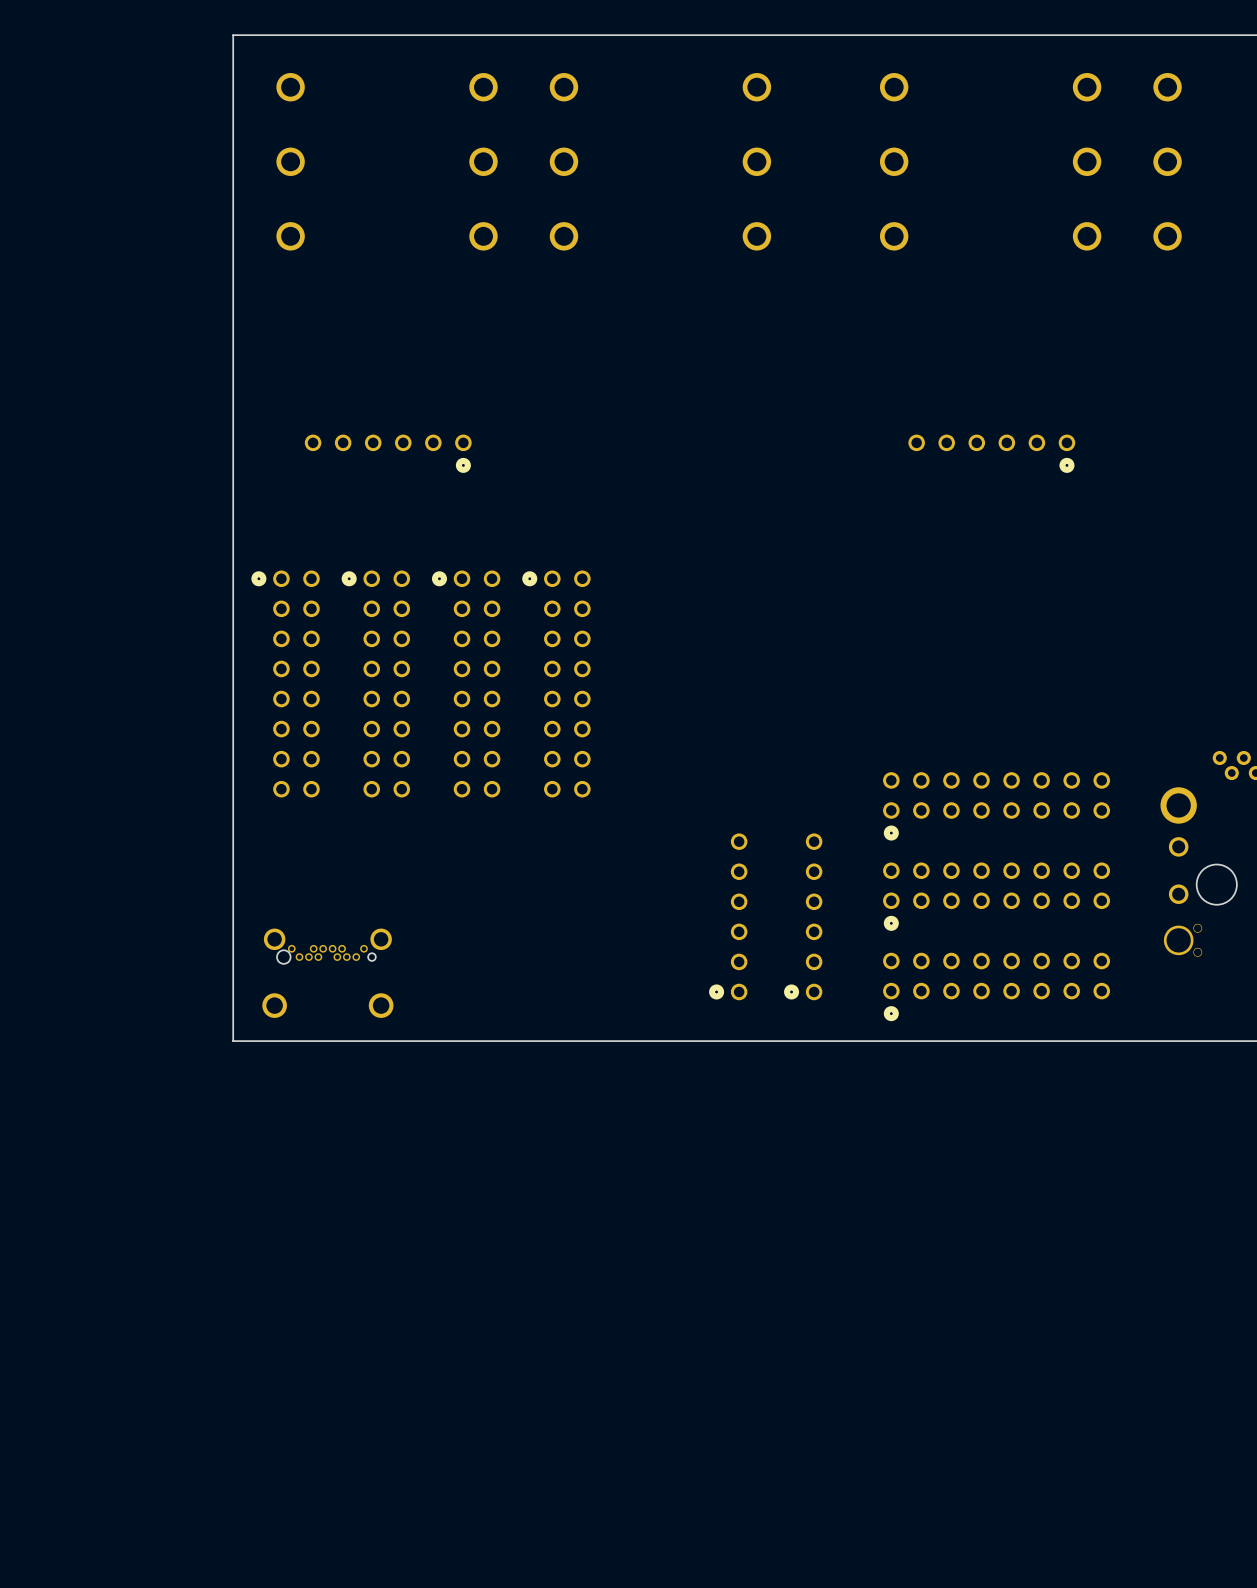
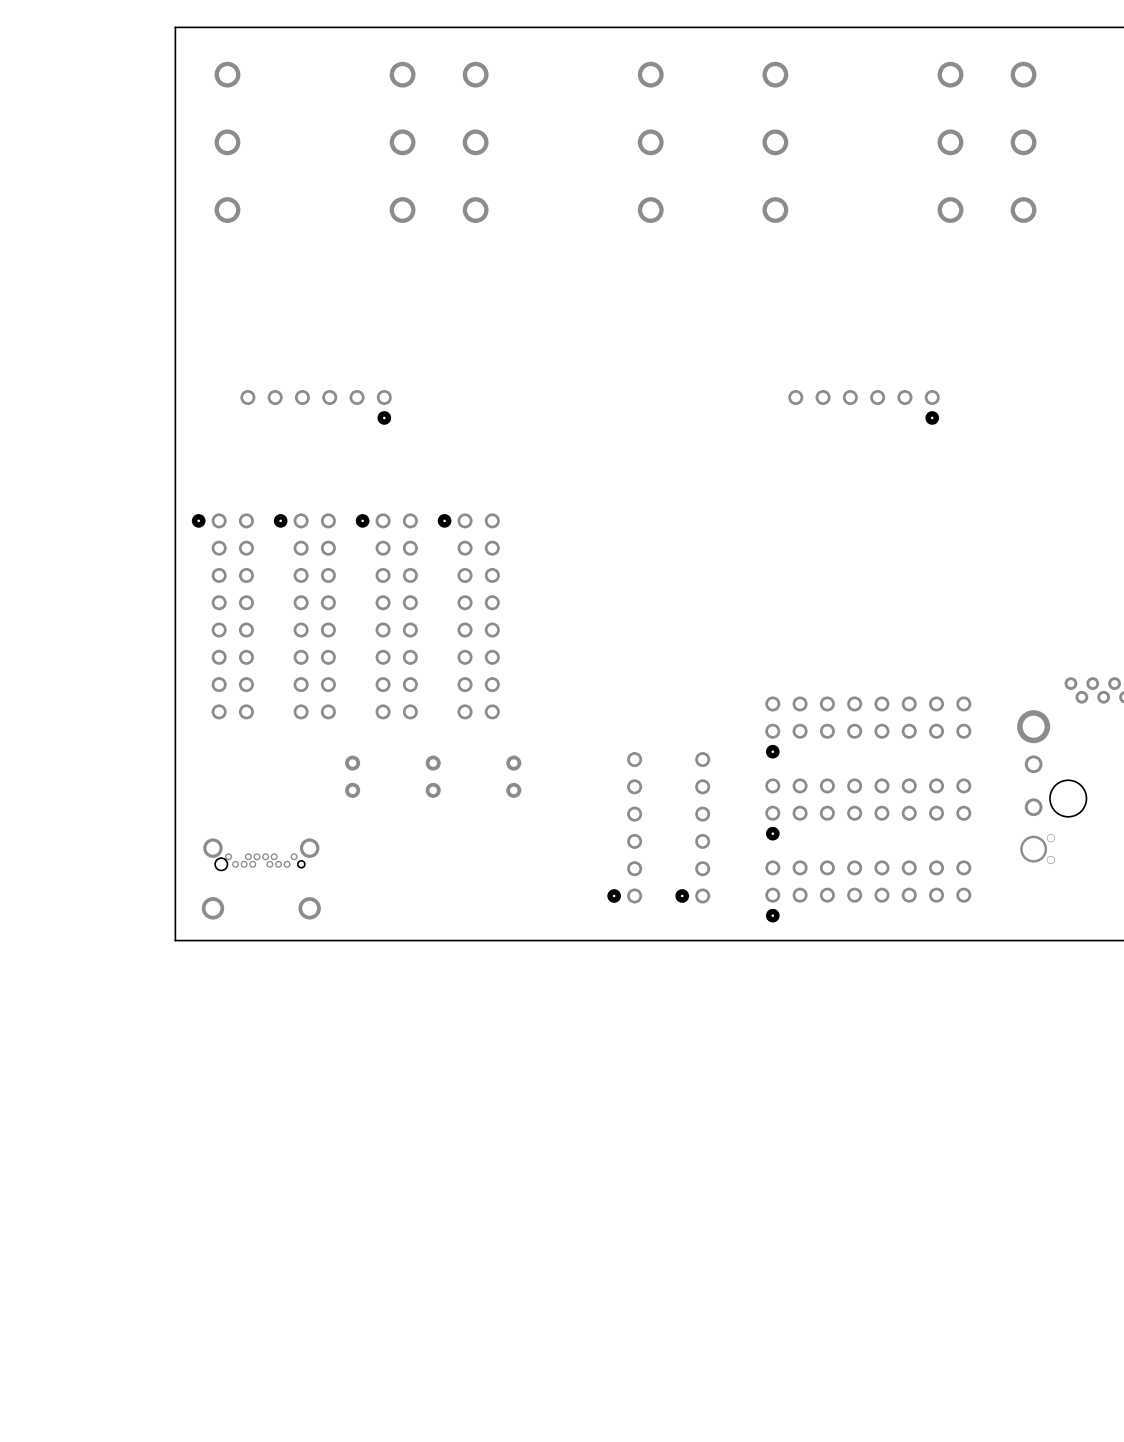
part: none -> (352, 776)
part: none -> (433, 776)
part: none -> (513, 776)

